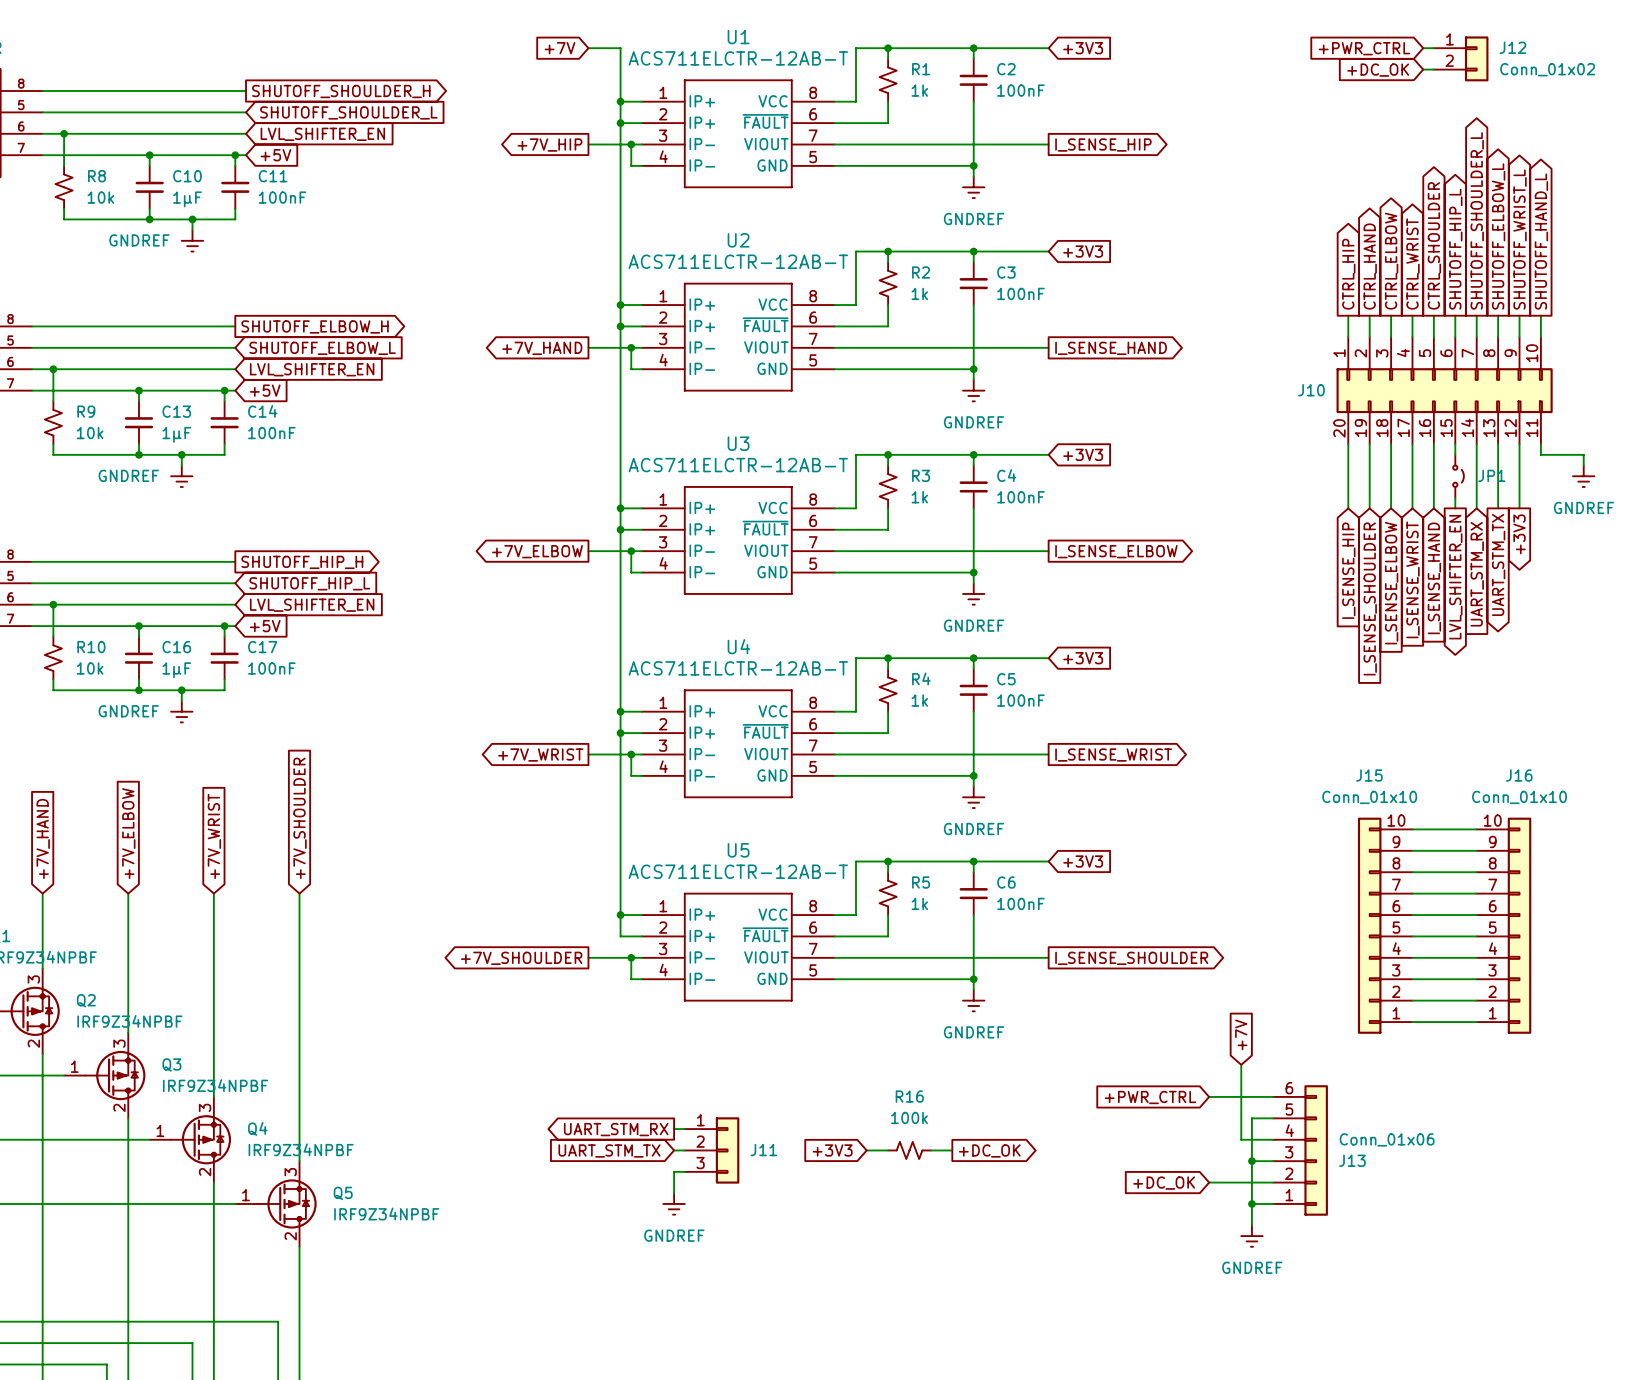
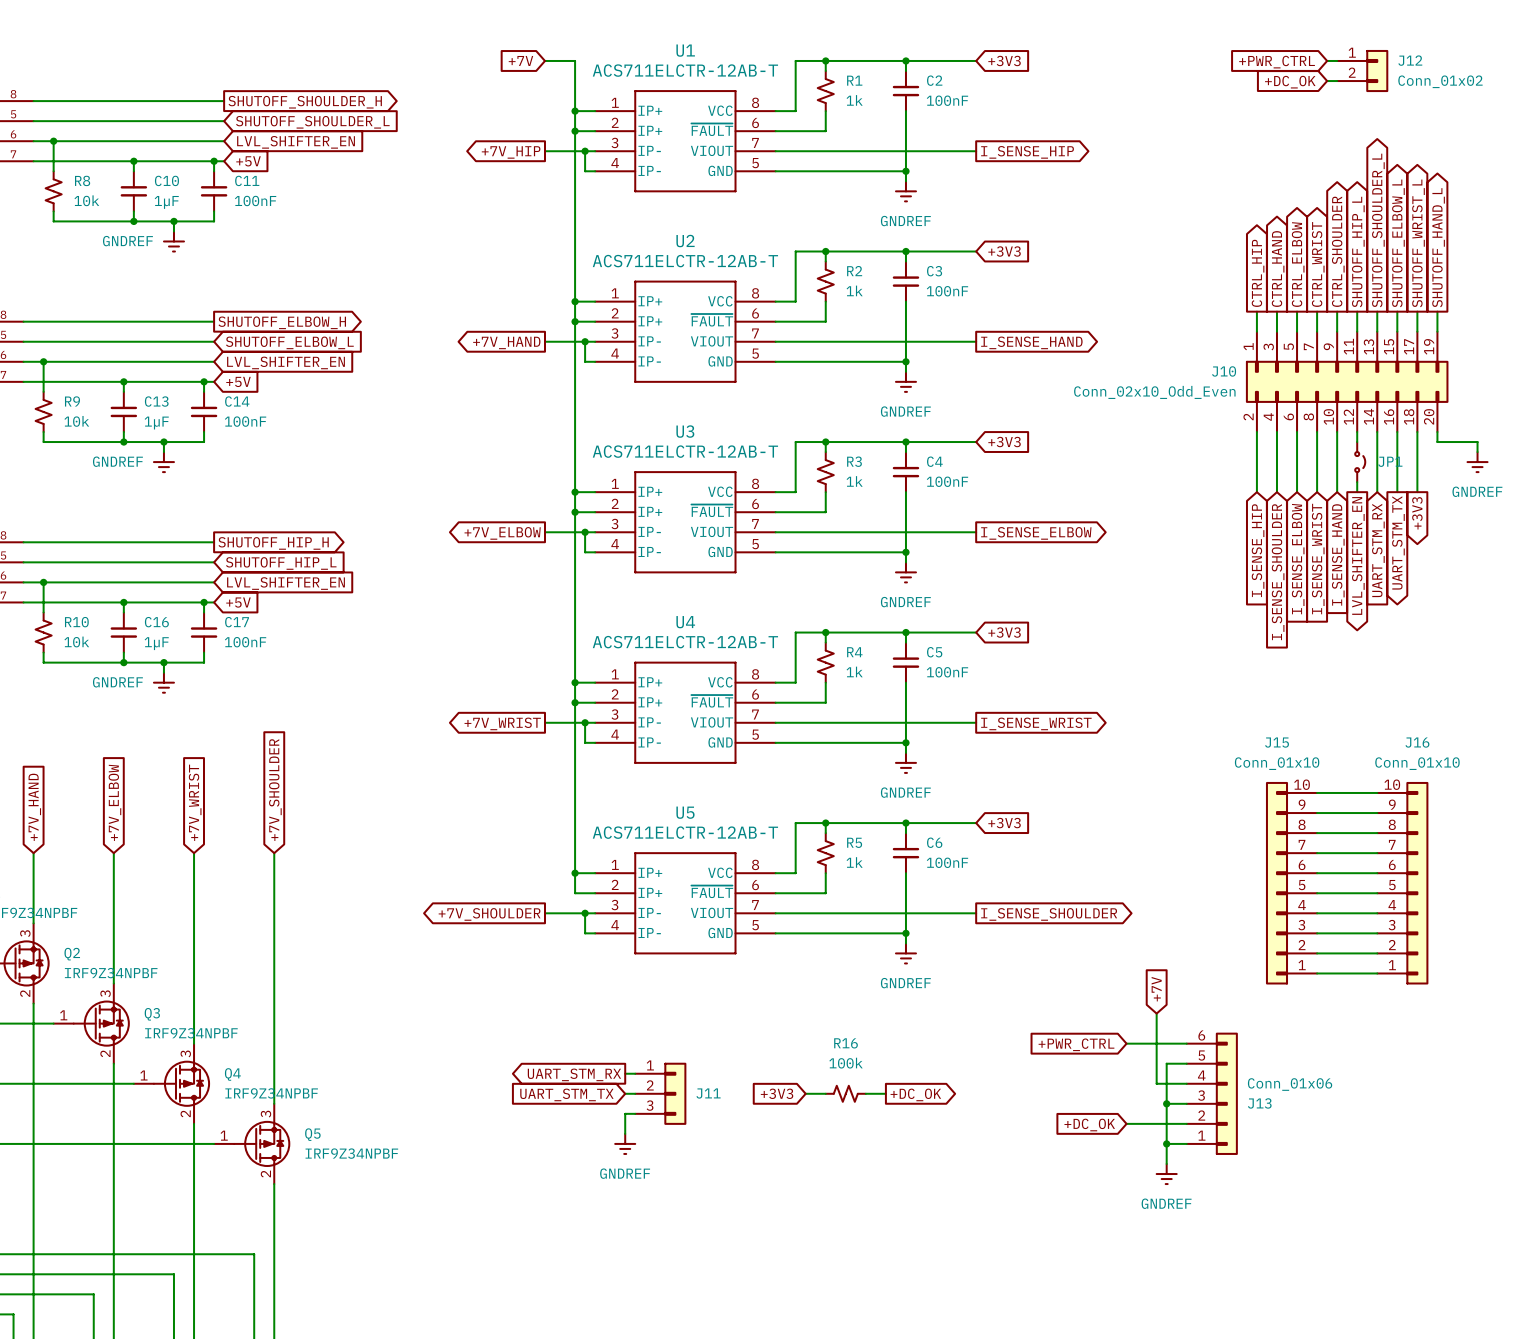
J10 symbol: [1336, 337, 1553, 445] -> [1245, 331, 1449, 432]
J10 value: none -> Conn_02x10_Odd_Even (1154, 392)

